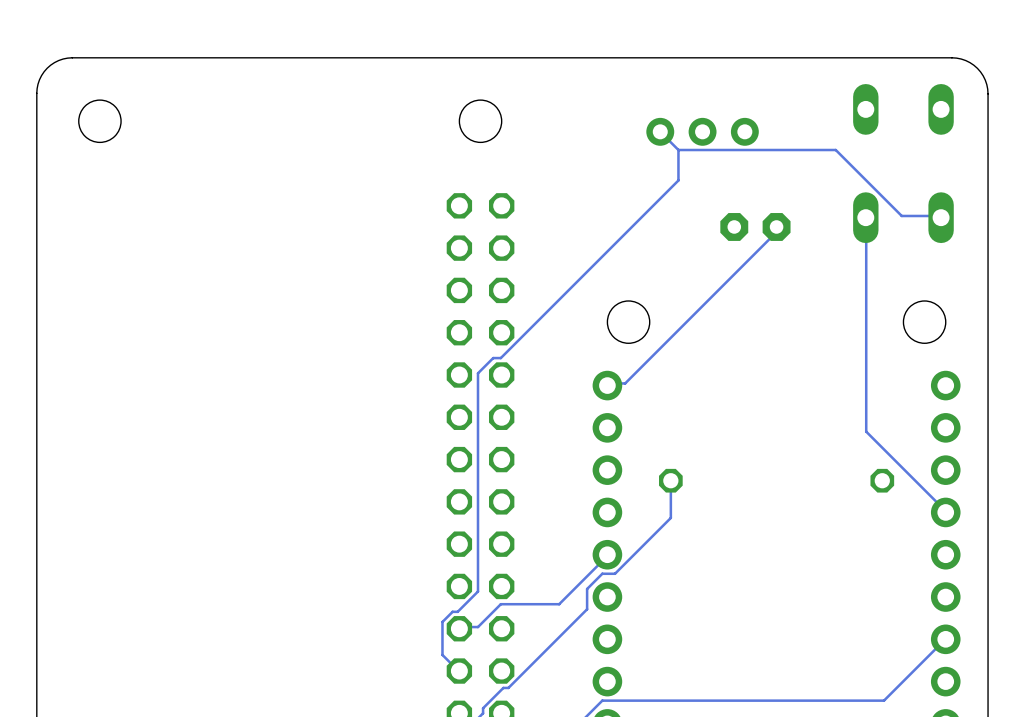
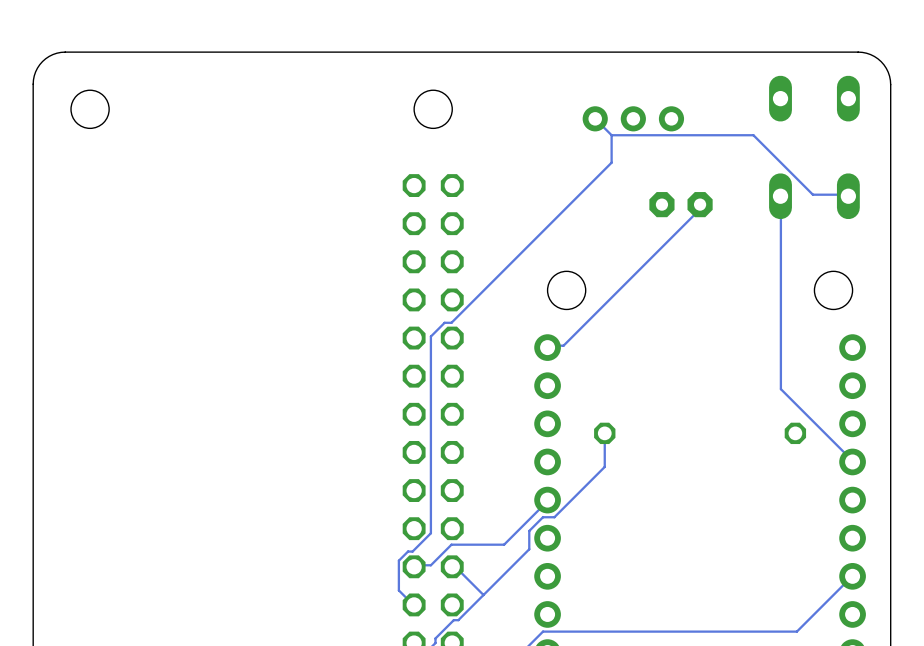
track: none -> (452, 566) (453, 565) (483, 595)

